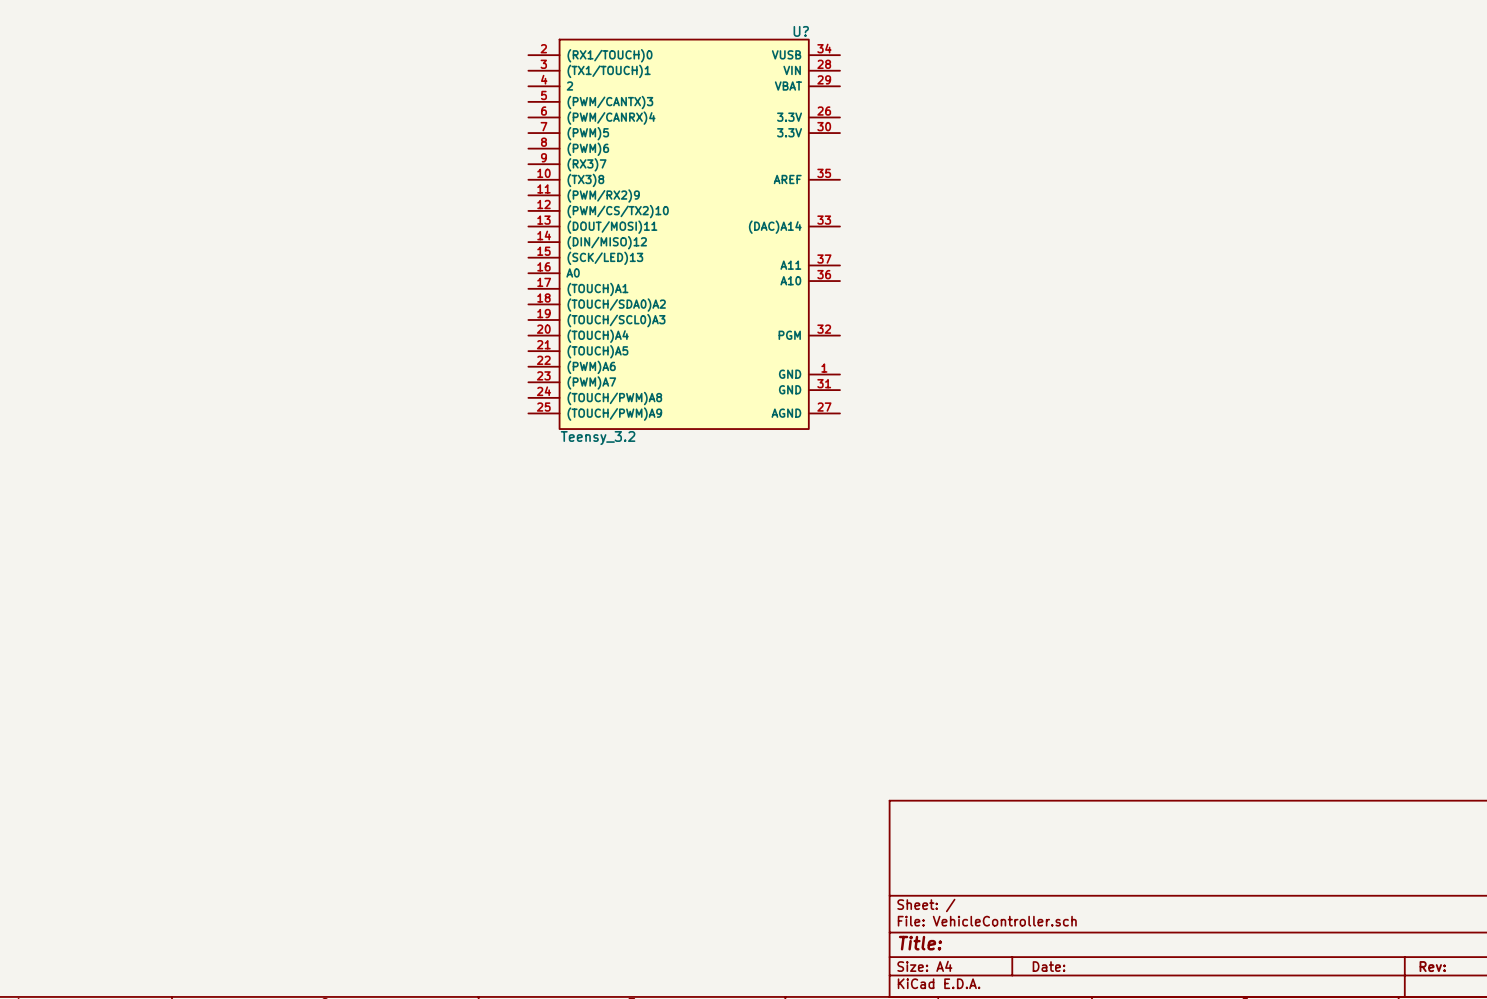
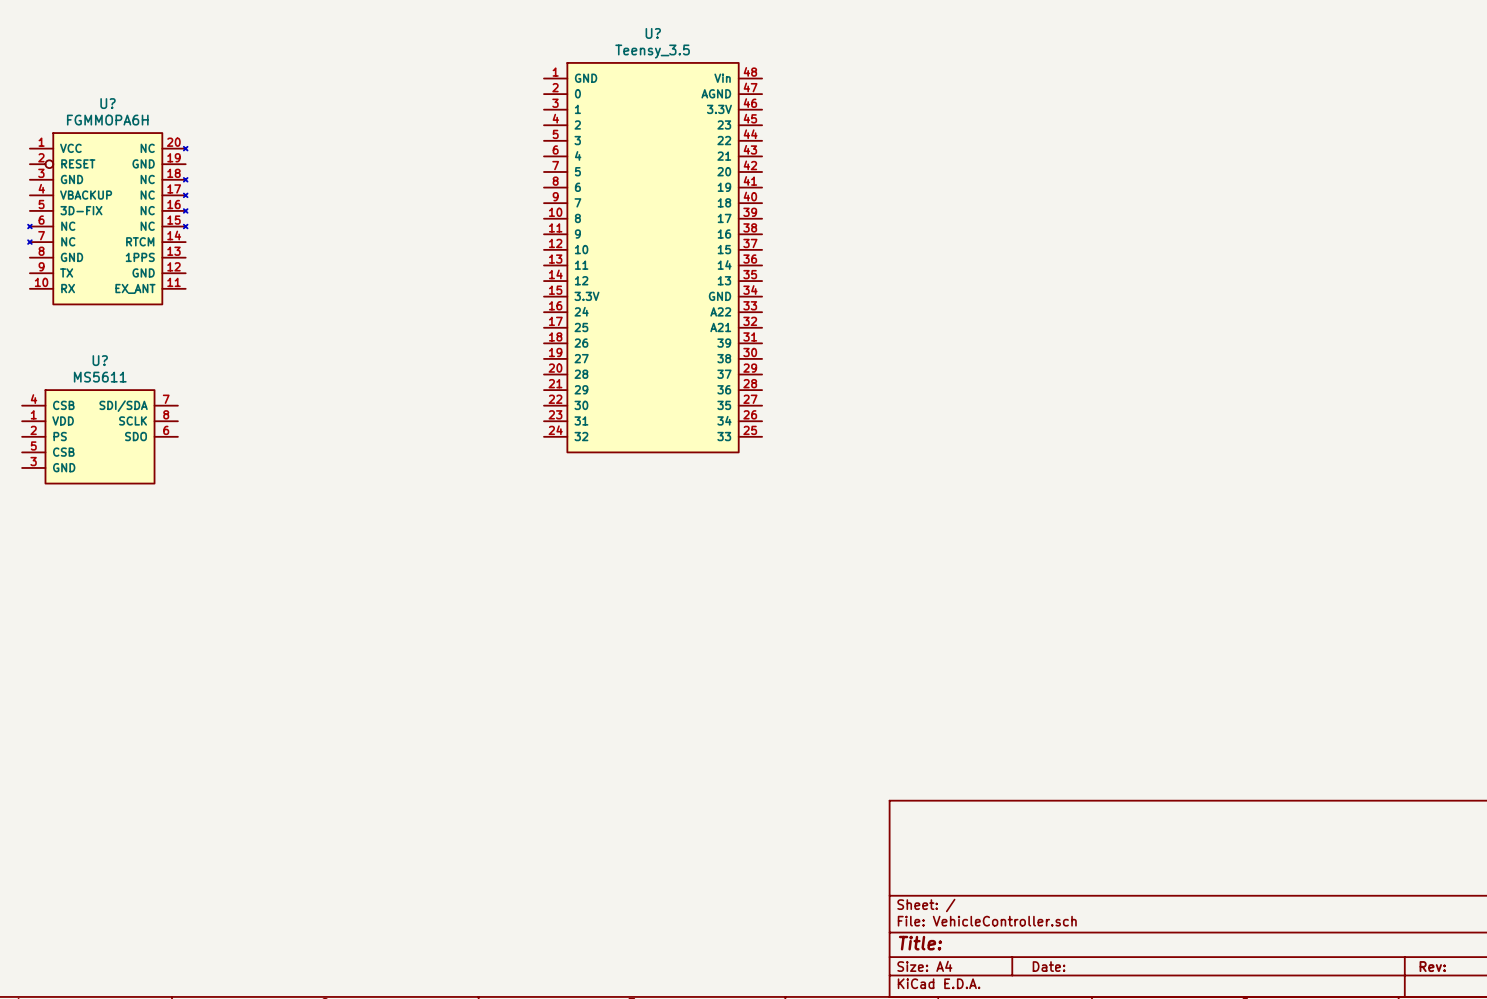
U?: none -> FGMMOPA6H (107, 218)
U?: Teensy_3.2 (684, 234) -> none
U?: none -> Teensy_3.5 (653, 257)
U?: none -> MS5611 (100, 436)

